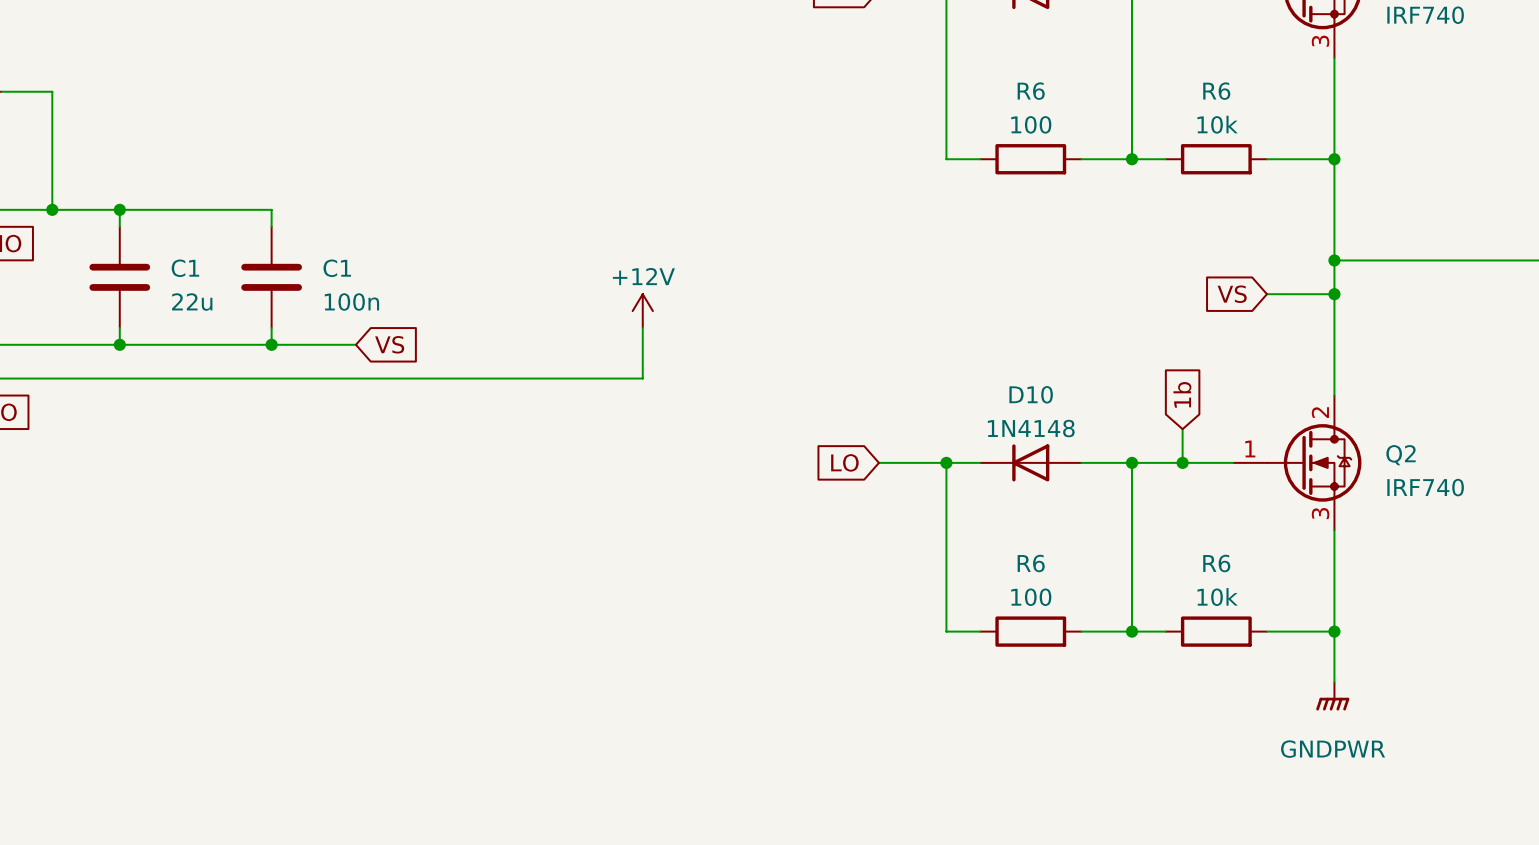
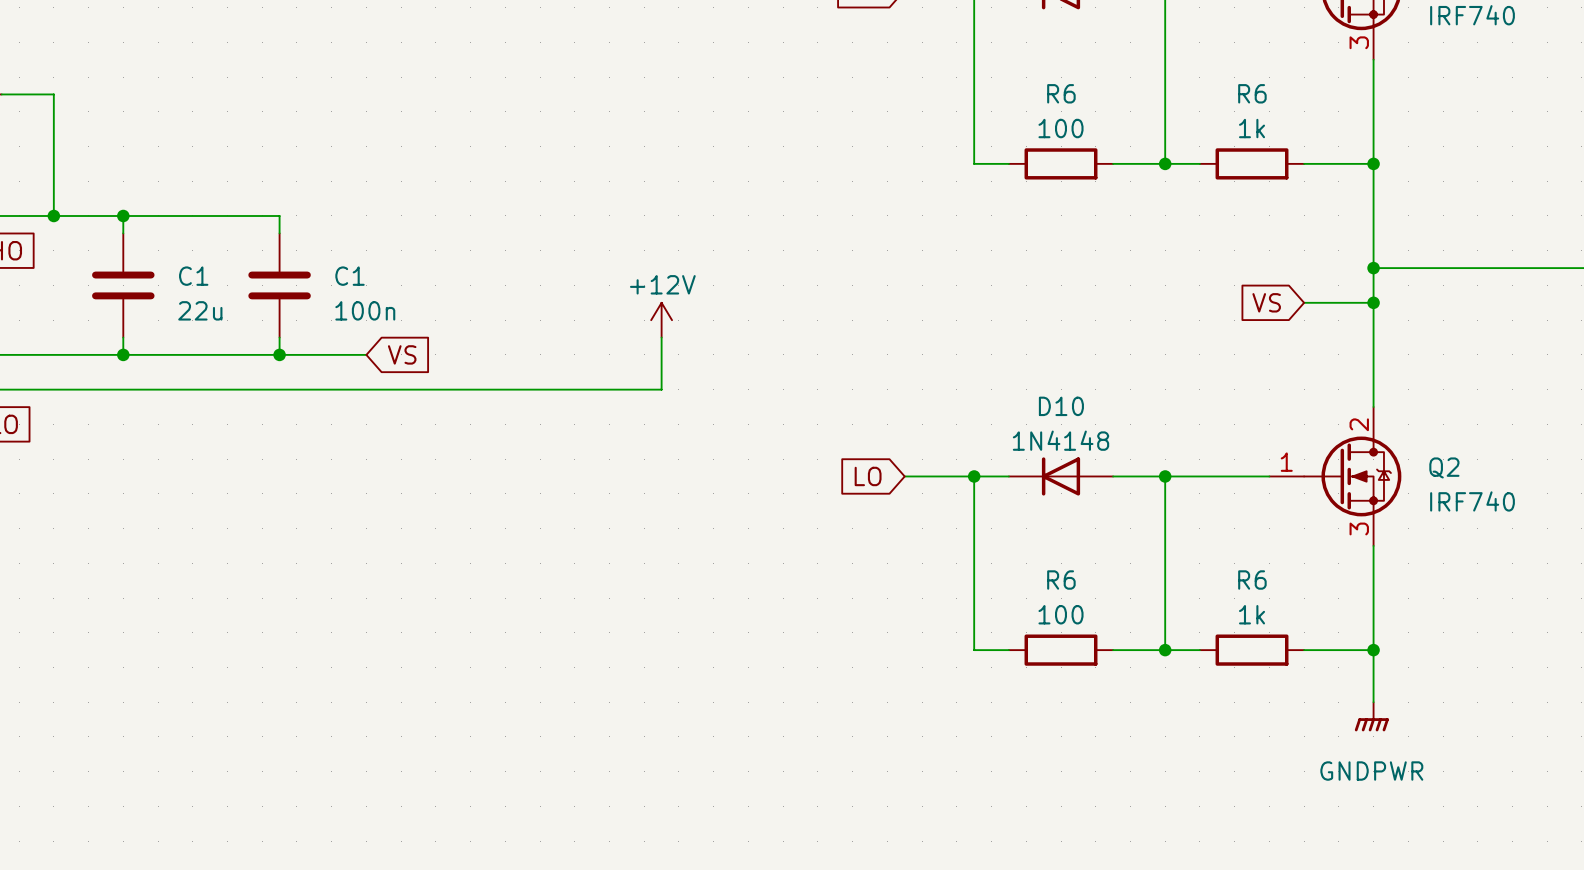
R6 value: 10k (1217, 124) -> 1k (1252, 128)
global label: 1b (1182, 394) -> none
wire: (1182, 429) (1182, 462) -> none
junction: (1182, 462) -> none
R6 value: 10k (1217, 597) -> 1k (1252, 614)

